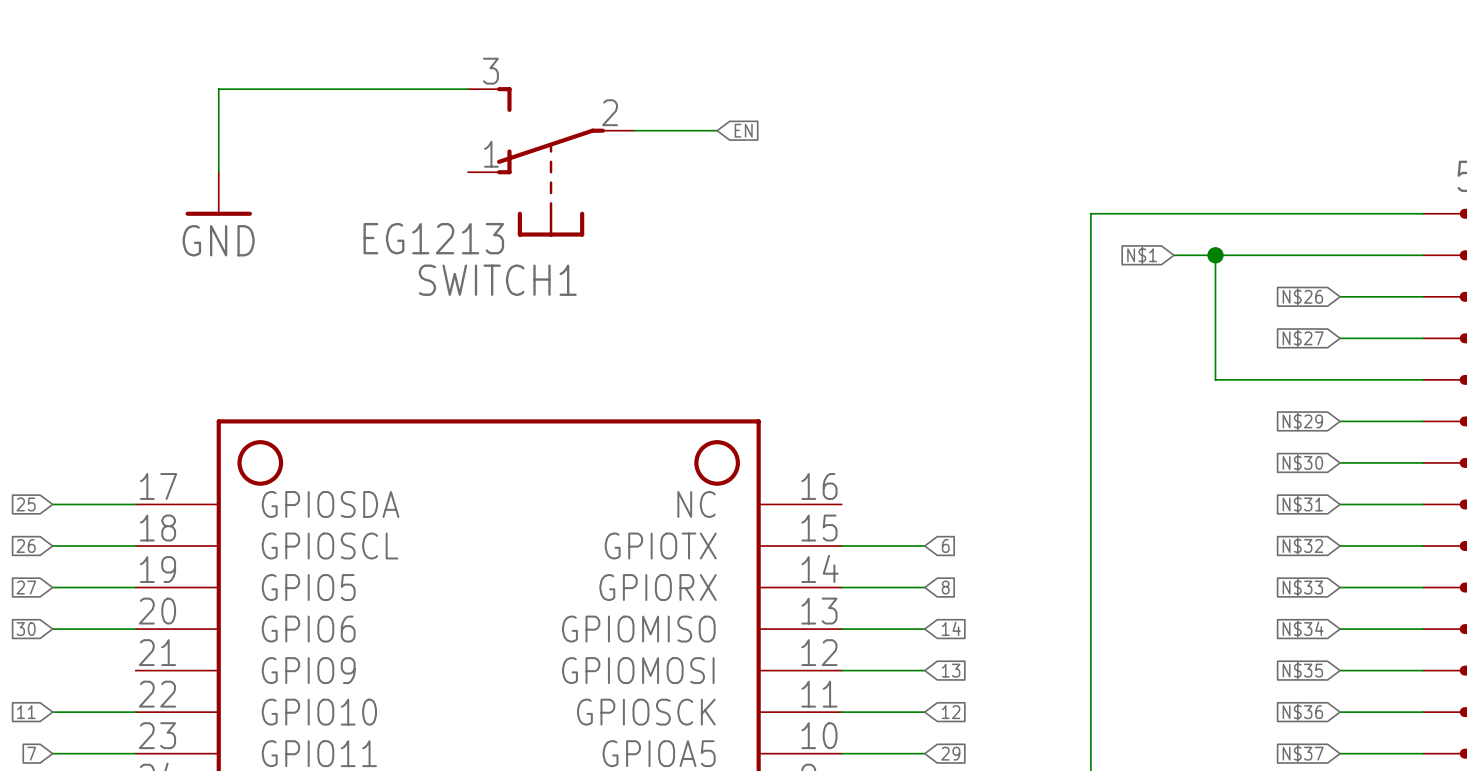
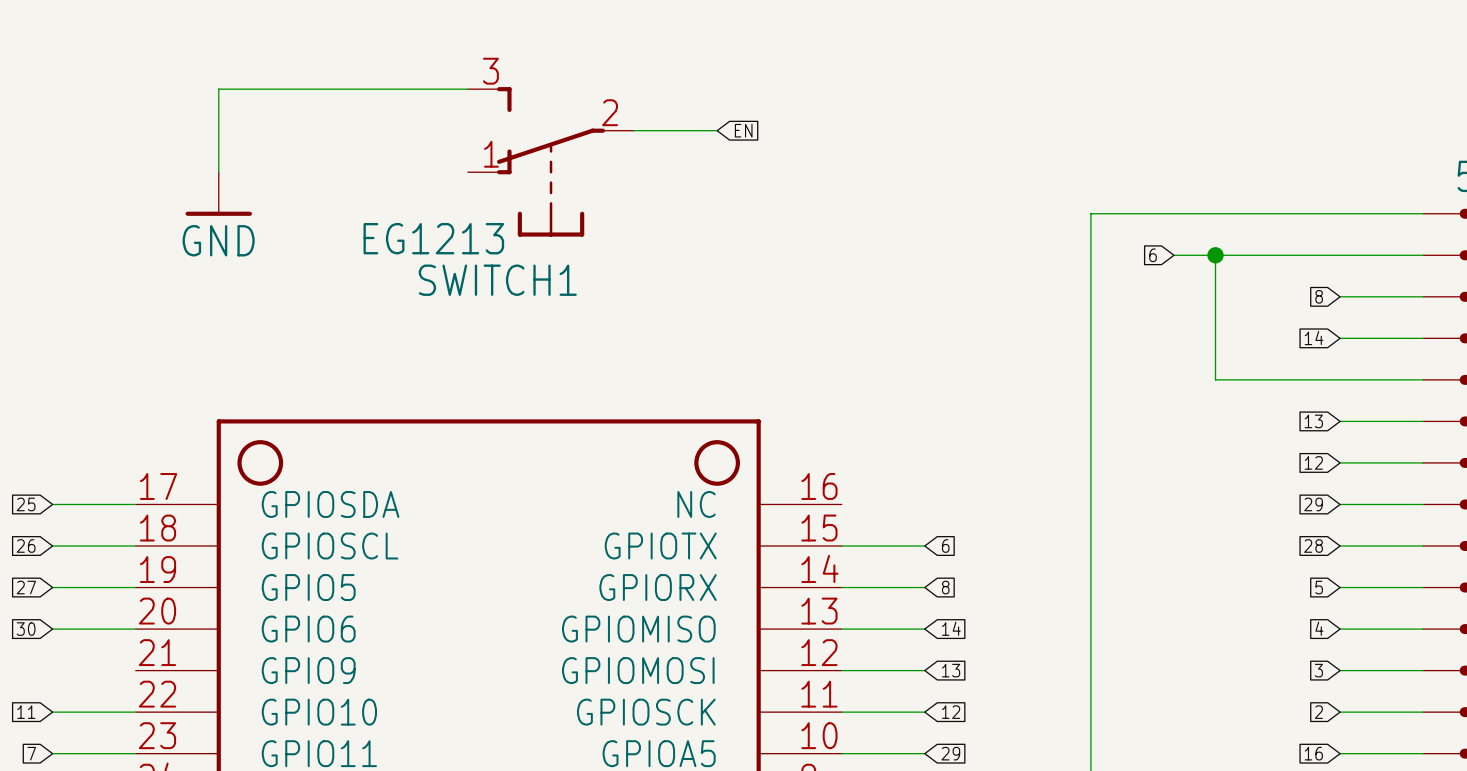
global label: N$1 (1142, 255) -> 6 (1153, 255)
global label: N$26 (1302, 296) -> 8 (1319, 296)
global label: N$27 (1303, 338) -> 14 (1314, 338)
global label: N$29 (1302, 421) -> 13 (1313, 421)
global label: N$30 (1302, 462) -> 12 (1313, 462)
global label: N$31 (1302, 504) -> 29 (1313, 504)
global label: N$32 (1302, 546) -> 28 (1313, 546)
global label: N$33 (1302, 587) -> 5 (1319, 587)
global label: N$34 (1303, 629) -> 4 (1319, 628)
global label: N$35 (1302, 670) -> 3 (1318, 670)
global label: N$36 (1302, 712) -> 2 (1318, 712)
global label: N$37 (1303, 753) -> 16 (1313, 753)

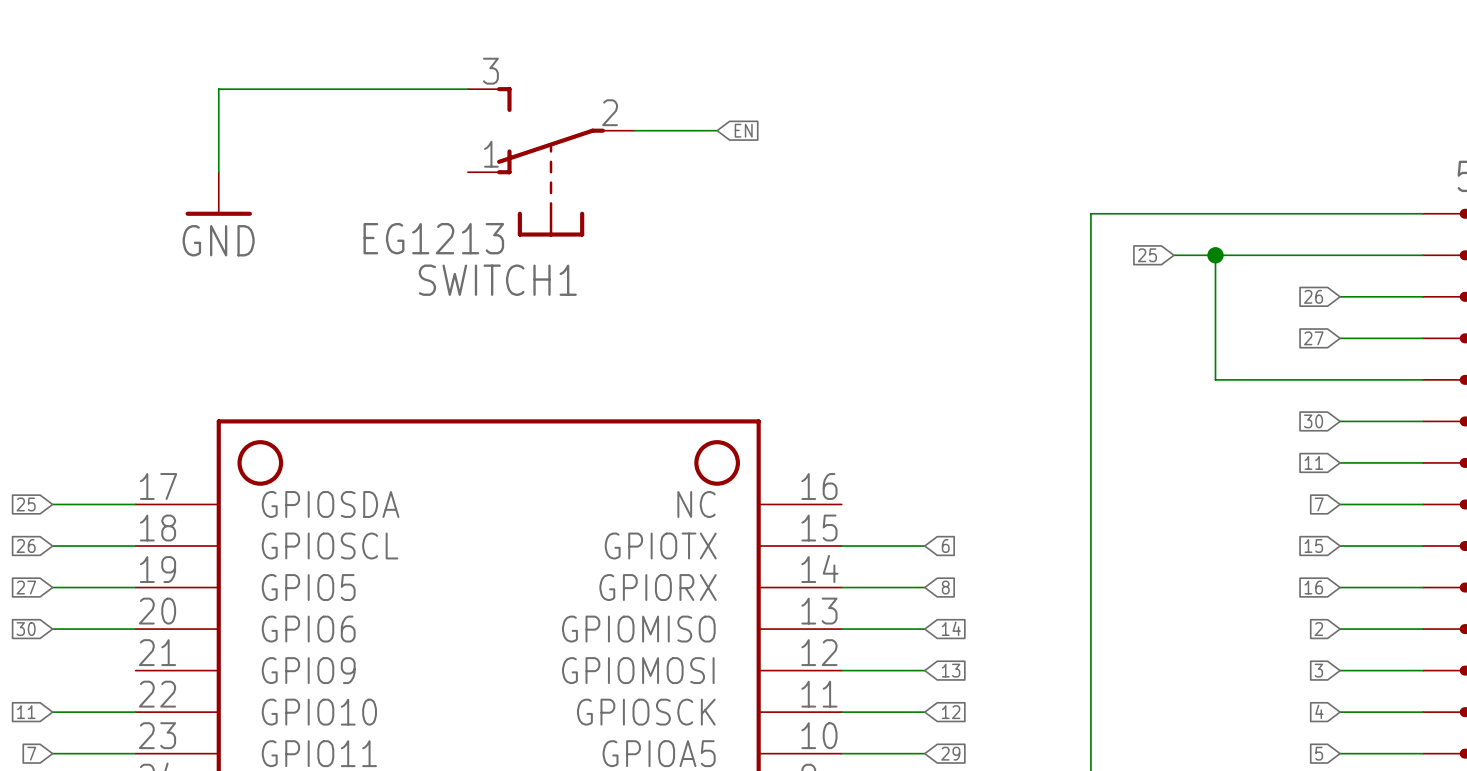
global label: 6 (1153, 255) -> 25 (1147, 255)
global label: 8 (1319, 296) -> 26 (1313, 296)
global label: 14 (1314, 338) -> 27 (1313, 338)
global label: 13 (1313, 421) -> 30 (1313, 421)
global label: 12 (1313, 462) -> 11 (1313, 462)
global label: 29 (1313, 504) -> 7 (1319, 504)
global label: 28 (1313, 546) -> 15 (1313, 546)
global label: 5 (1319, 587) -> 16 (1313, 587)
global label: 4 (1319, 628) -> 2 (1318, 629)
global label: 2 (1318, 712) -> 4 (1319, 711)
global label: 16 (1313, 753) -> 5 (1319, 753)

